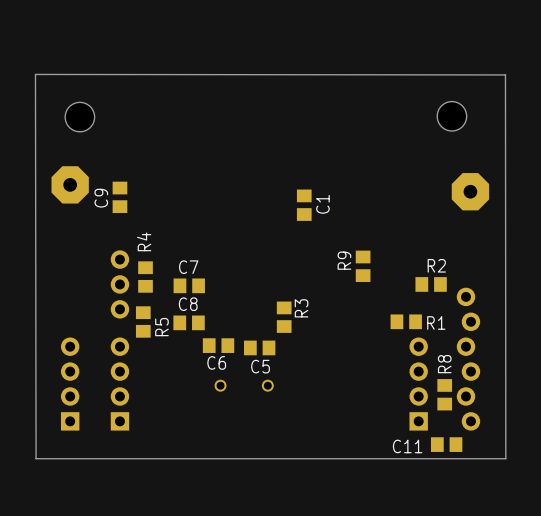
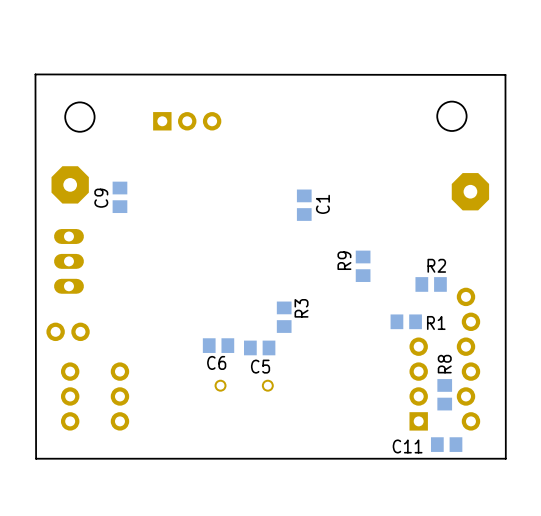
part: none -> (187, 121)
part: none -> (68, 261)
R4: (145, 277) -> none
part: (119, 284) -> none
C7: (189, 285) -> none
R5: (143, 321) -> none
C8: (189, 322) -> none
part: none -> (68, 331)
part: (70, 384) -> none
part: (119, 384) -> none
part: none -> (70, 396)
part: none -> (119, 396)

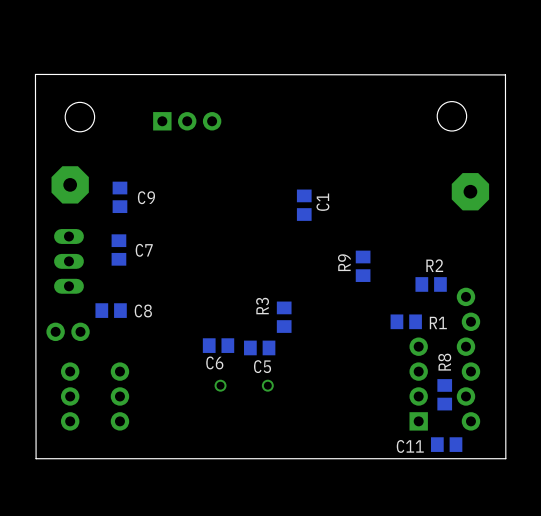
C9 name rotation: 0° (101, 198) -> 90° clockwise (146, 197)
C9 name position: C9 (101, 198) -> C9 (146, 197)
C7: none -> (118, 249)
R3 name position: R3 (301, 308) -> R3 (262, 306)
C8: none -> (111, 310)

